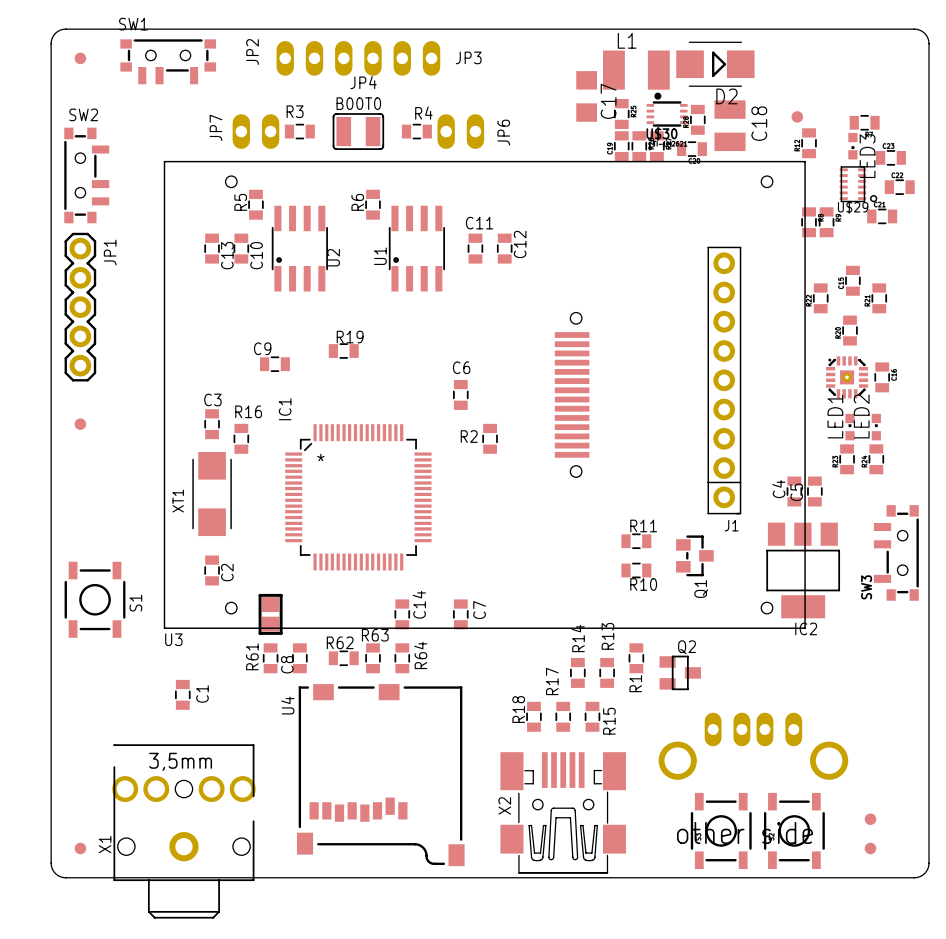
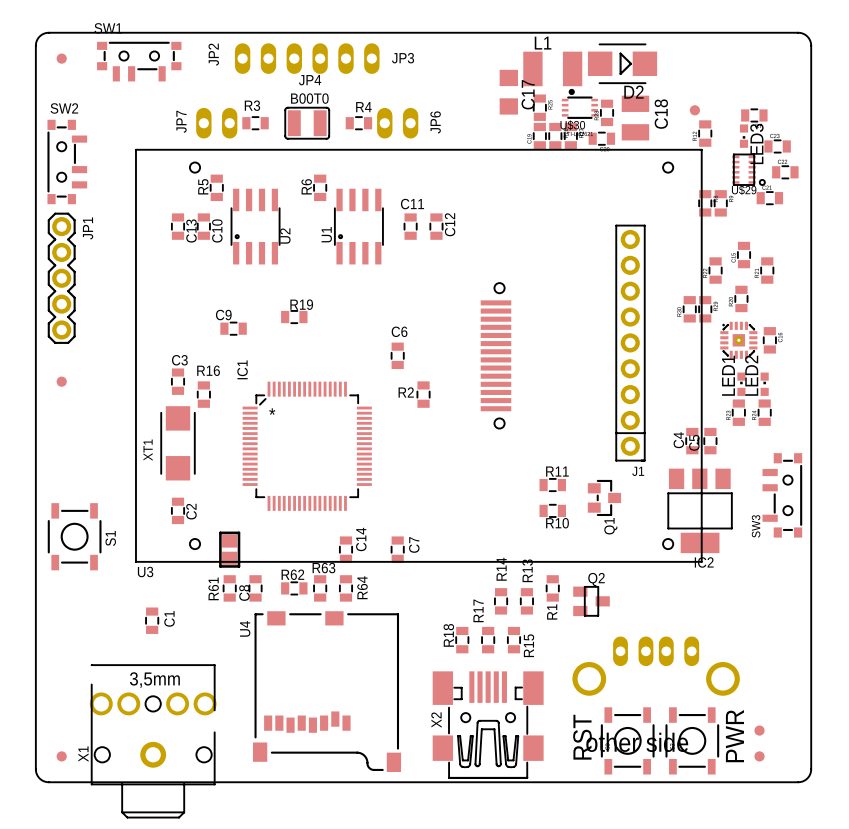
part: none -> (689, 309)
part: none -> (705, 309)
text: none -> RST (582, 737)
text: none -> PWR (734, 736)

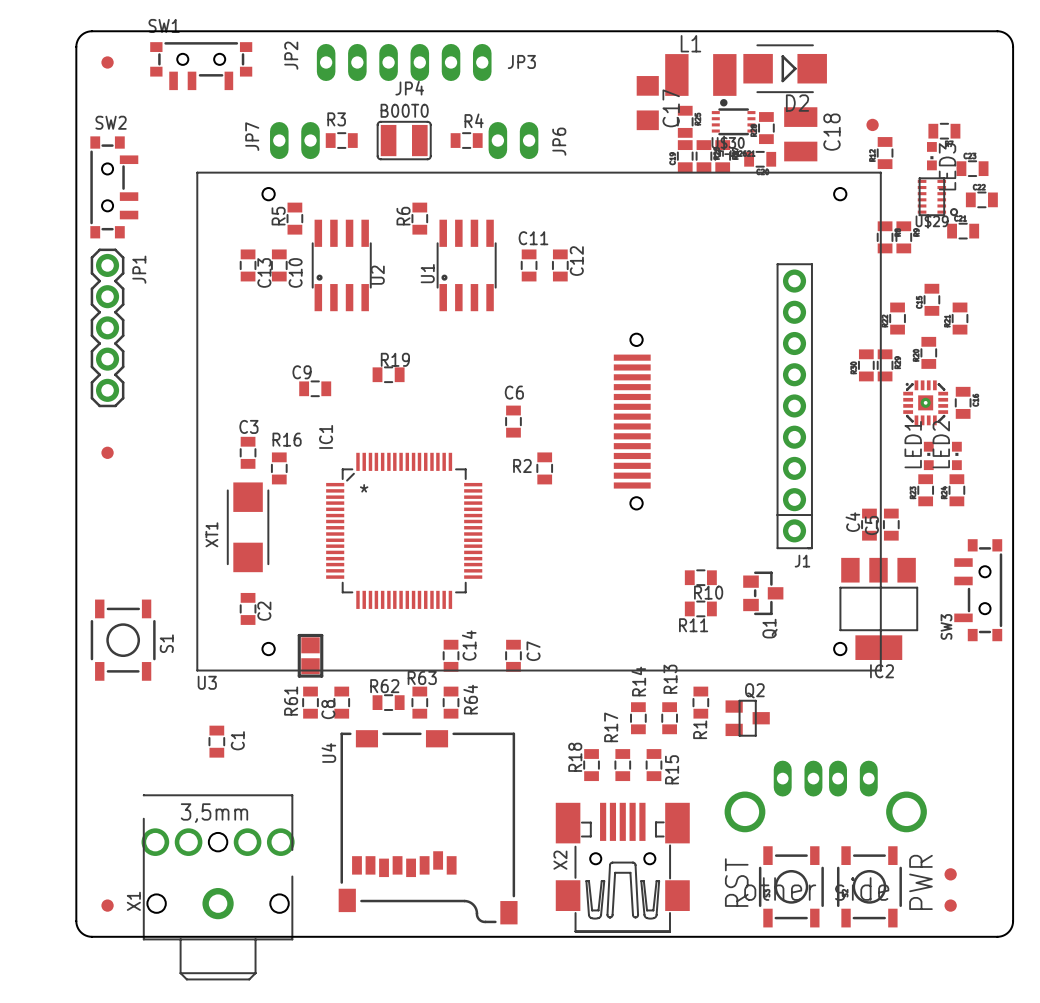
R11 name: R11 (557, 471) -> R10 (708, 592)
R10 name: R10 (557, 523) -> R11 (693, 625)

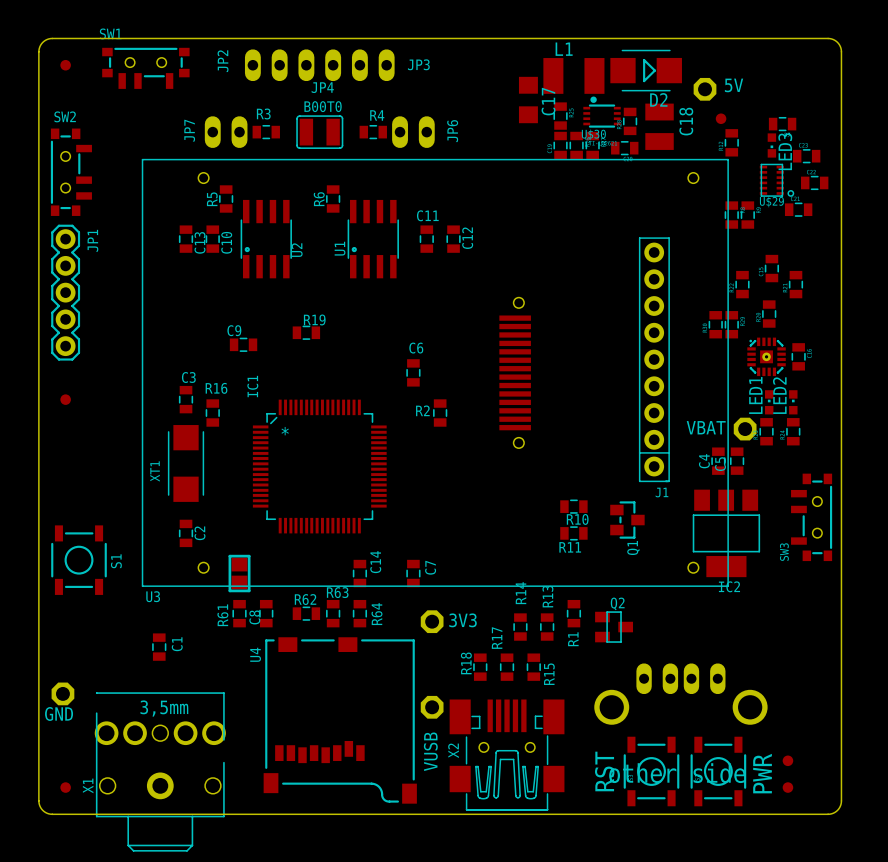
5V: none -> (705, 89)
VBAT: none -> (745, 429)
3V3: none -> (432, 621)
GND: none -> (62, 693)
VUSB: none -> (432, 707)

